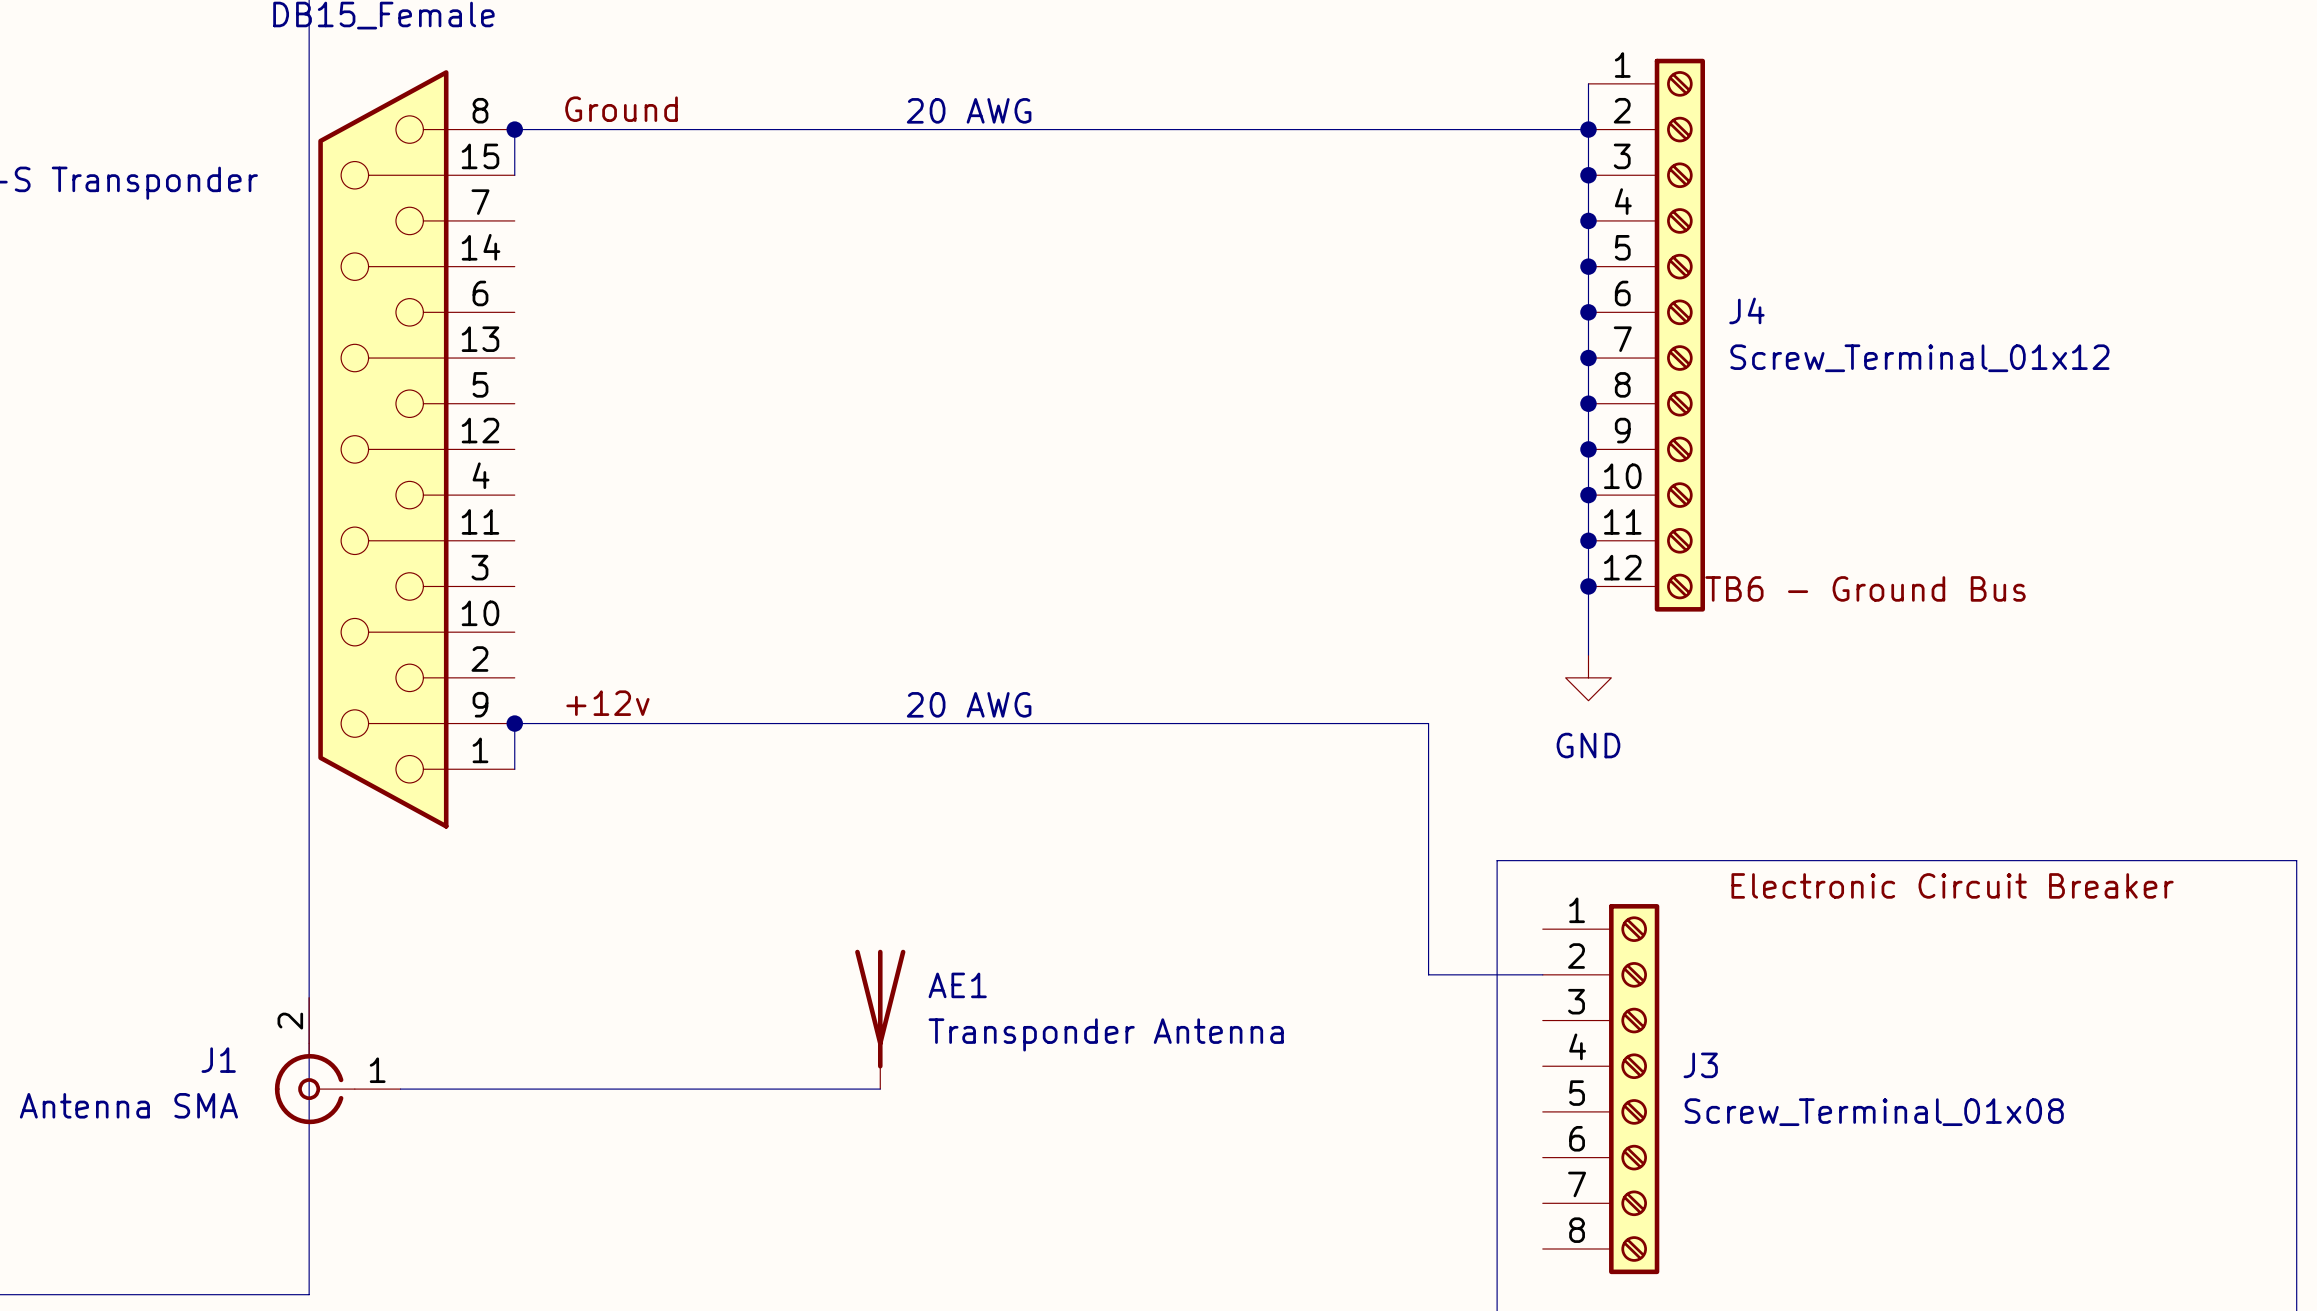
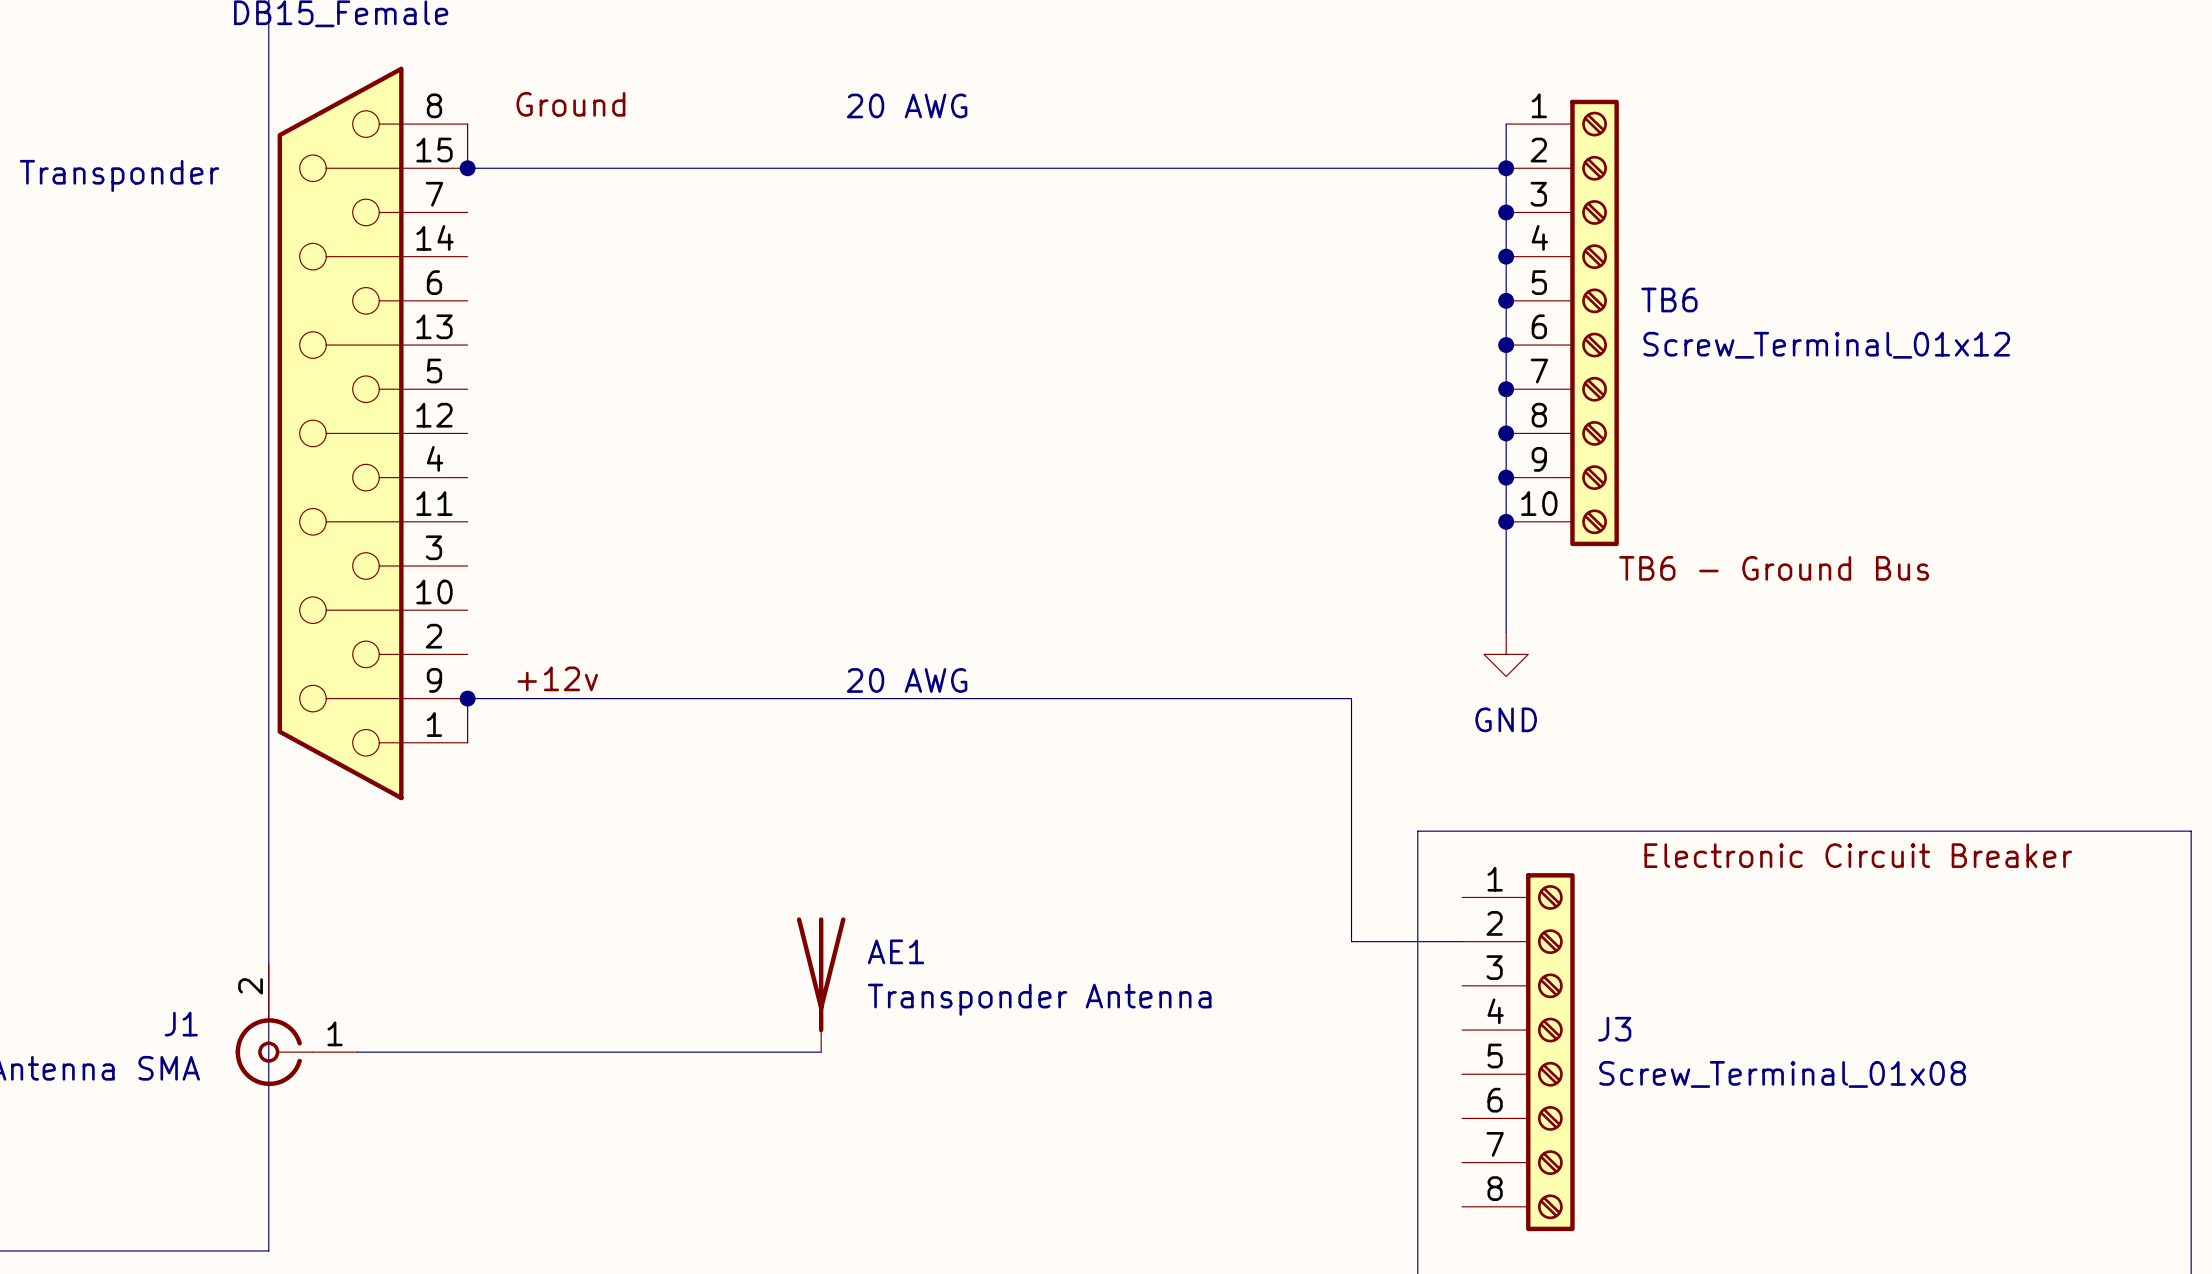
wire: (1588, 83) (1588, 129) (514, 129) -> none
junction position: (514, 129) -> (467, 168)
junction: (1588, 129) -> none
wire: none -> (467, 168) (1506, 168)
J4: Screw_Terminal_01x12 (1646, 335) -> none
TB6: none -> Screw_Terminal_01x12 (1562, 322)
junction: (1588, 586) -> none

